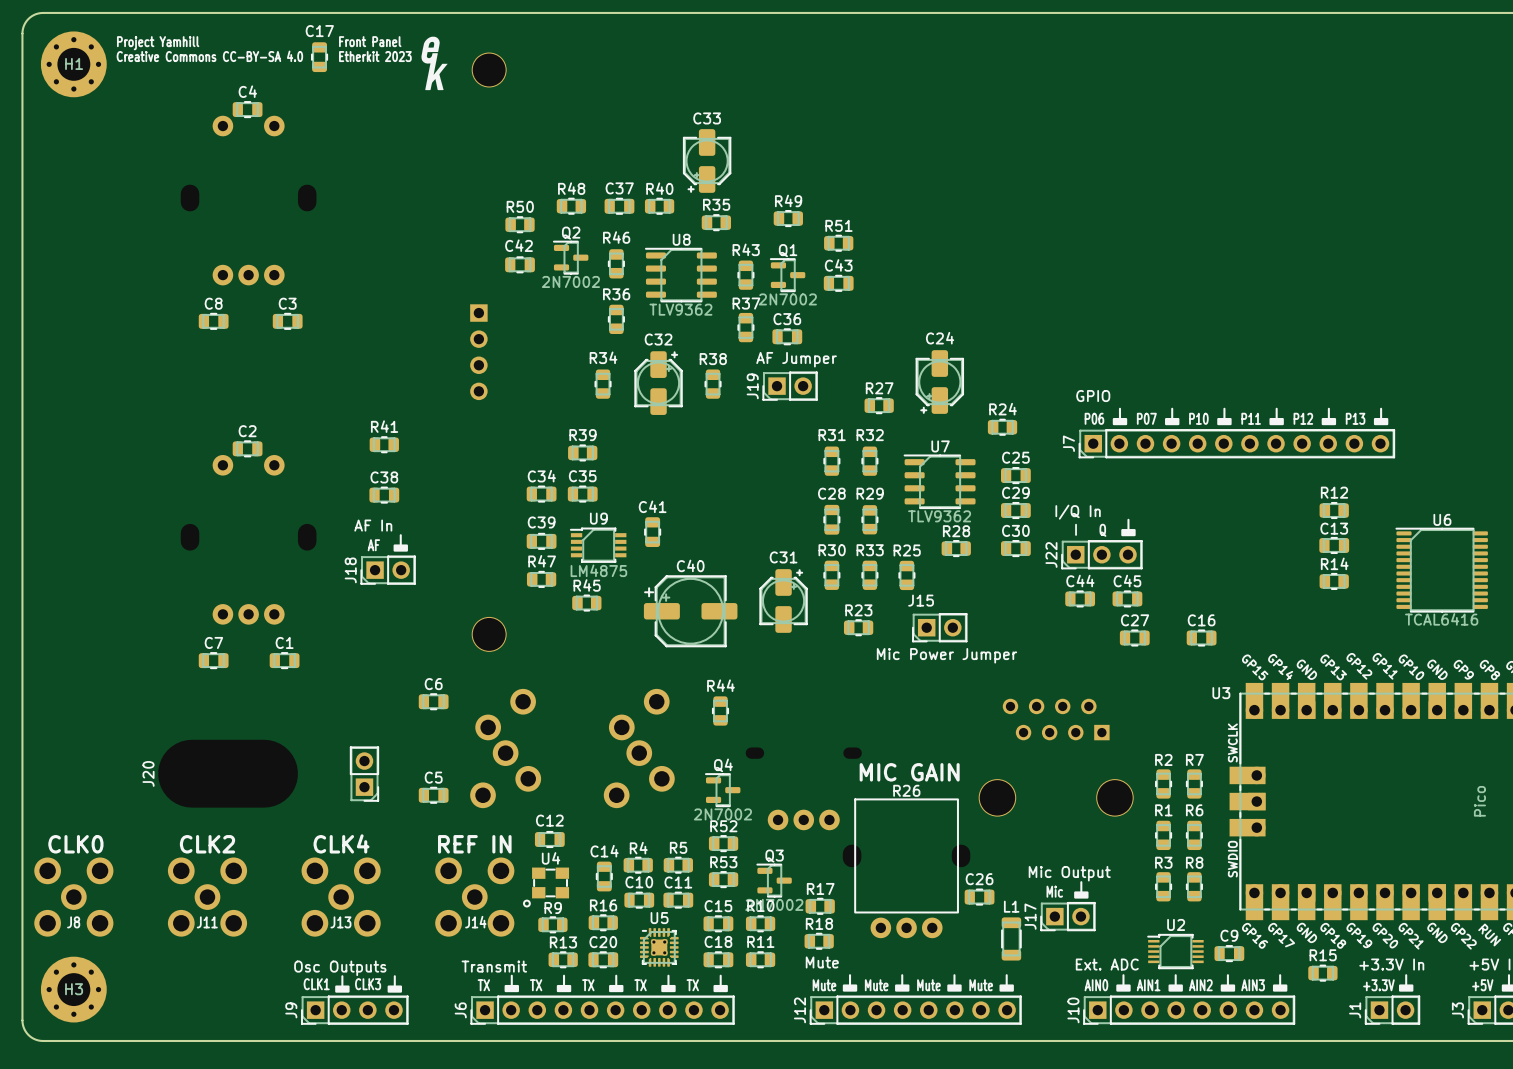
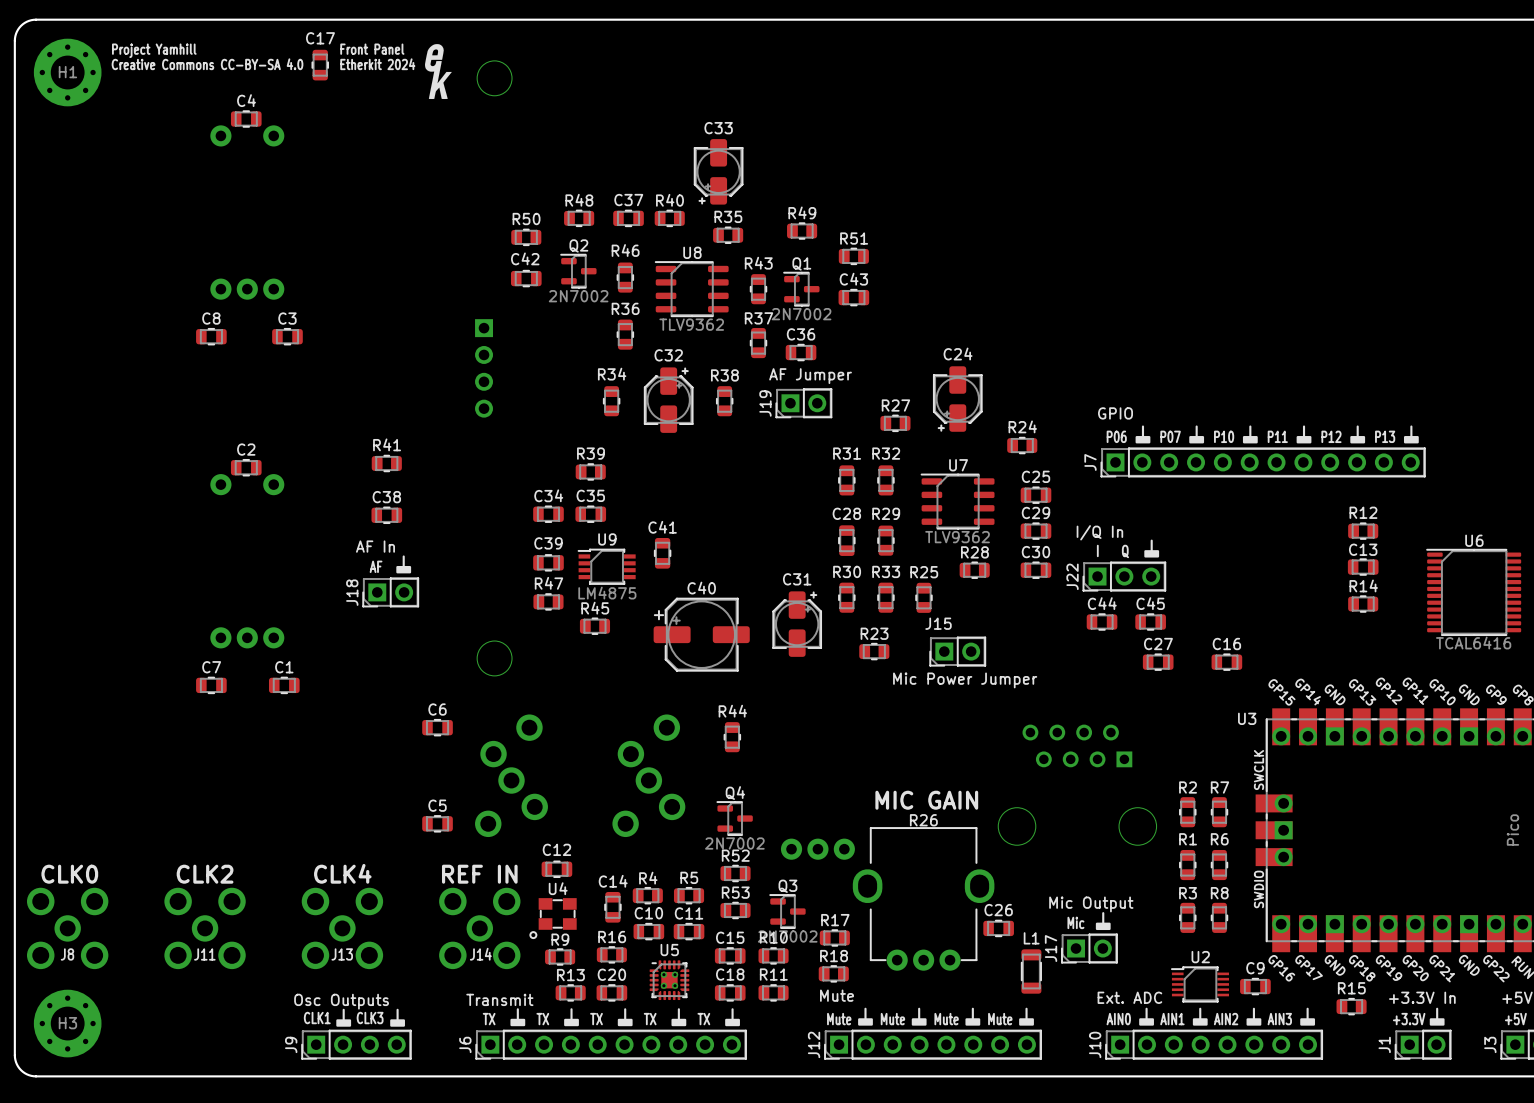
text: Etherkit 2023 (375, 56) -> Etherkit 2024 (377, 64)
J20: (268, 773) -> none
R26 footprint: [842, 798, 971, 939] -> [852, 827, 995, 971]

